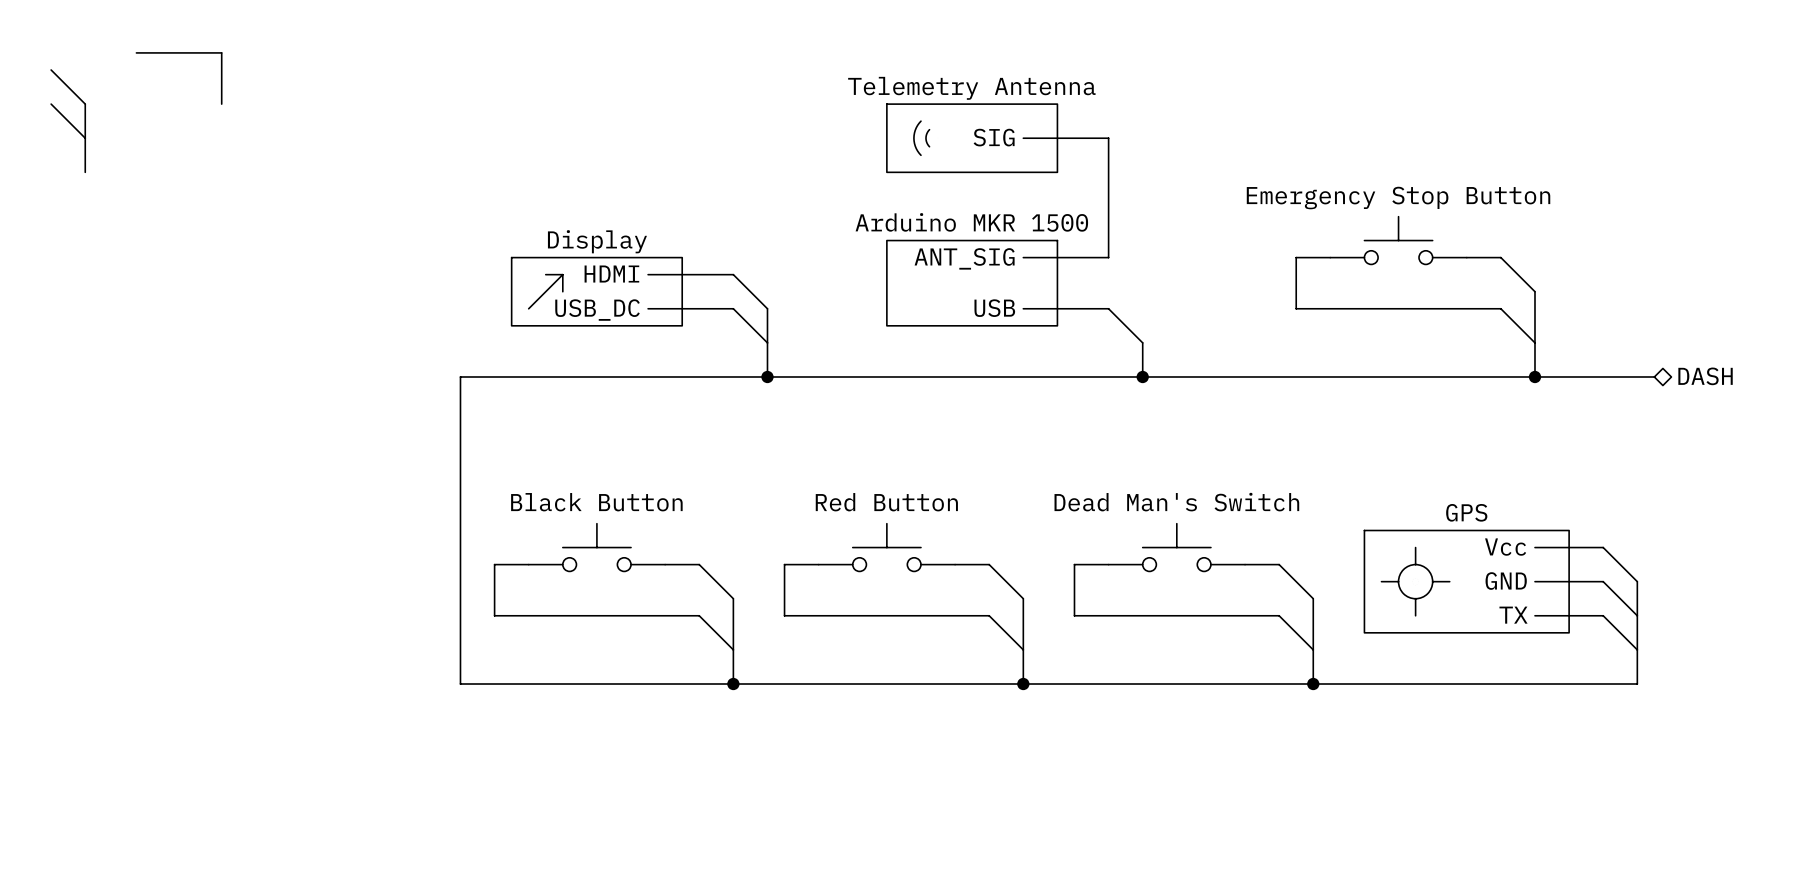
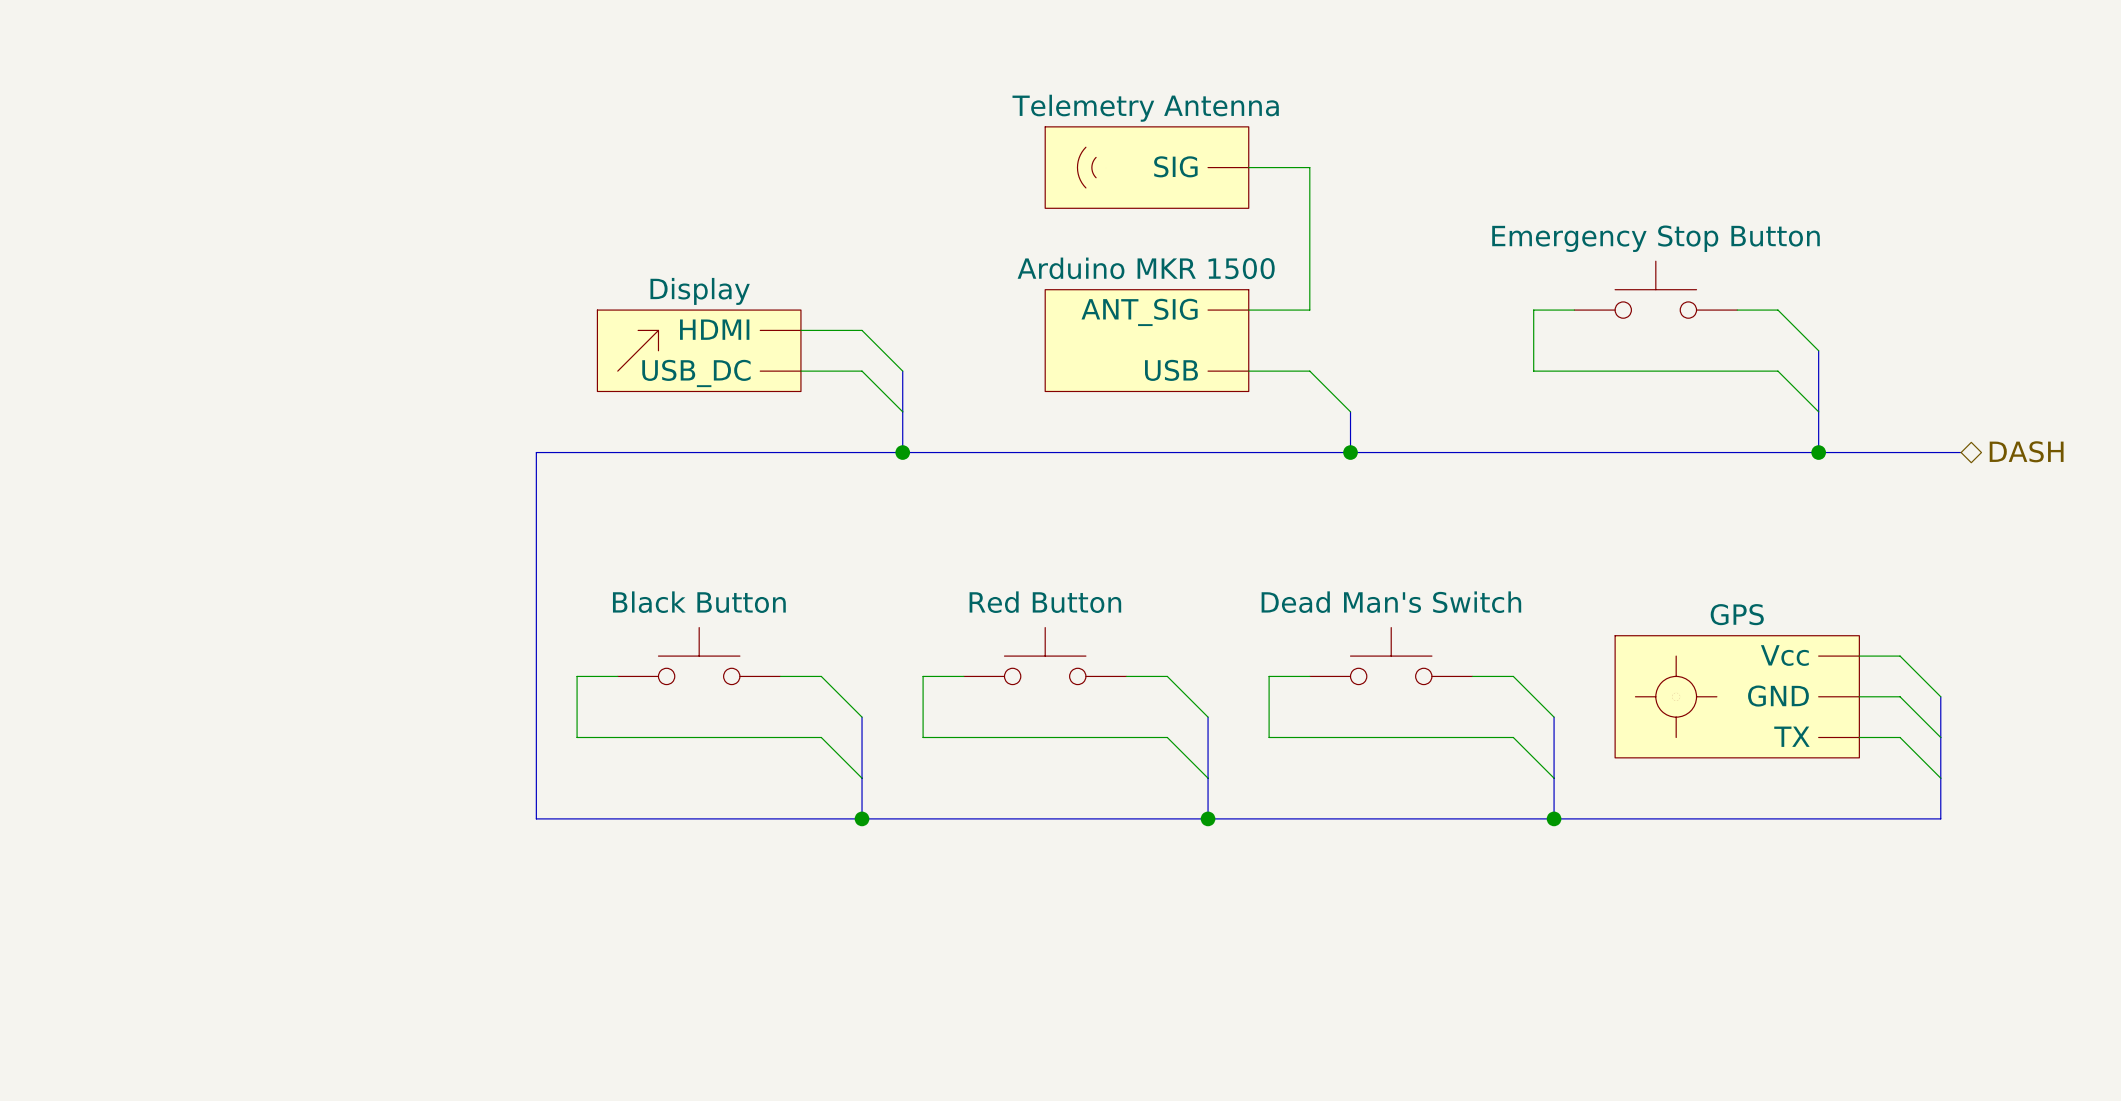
wire: (136, 52) (221, 52) -> none
bus: (221, 52) (221, 104) -> none
wire: (51, 69) (85, 104) -> none
wire: (51, 104) (85, 138) -> none
bus: (85, 104) (85, 172) -> none

